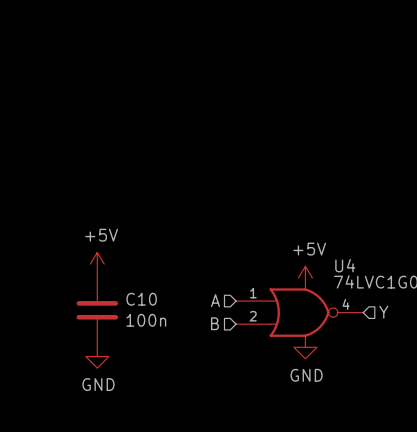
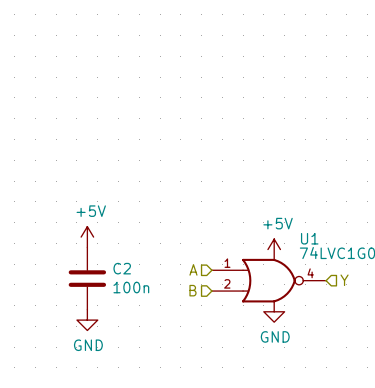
U4 name: U4 (345, 265) -> U1 (309, 238)
C10 name: C10 (141, 299) -> C2 (122, 268)

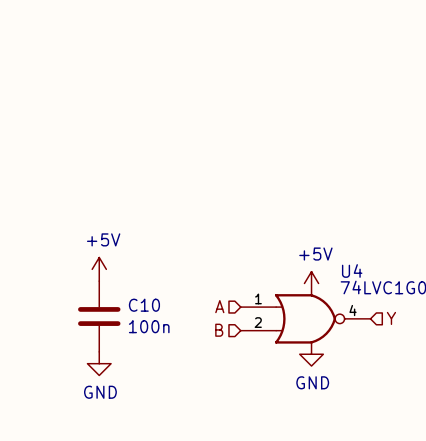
U1 name: U1 (309, 238) -> U4 (352, 270)
C2 name: C2 (122, 268) -> C10 (144, 305)

